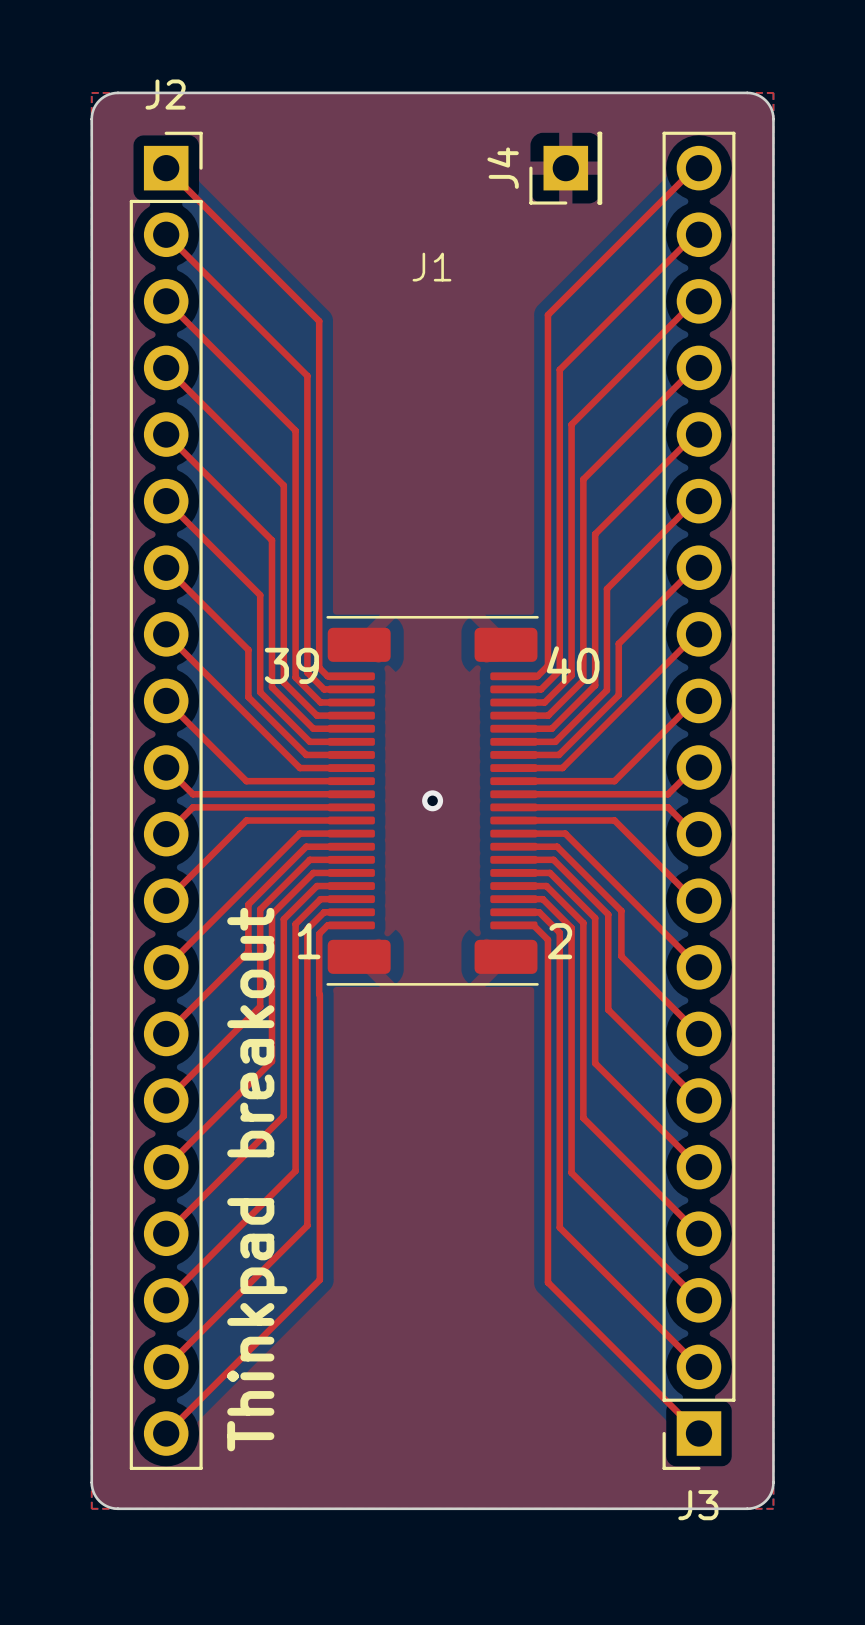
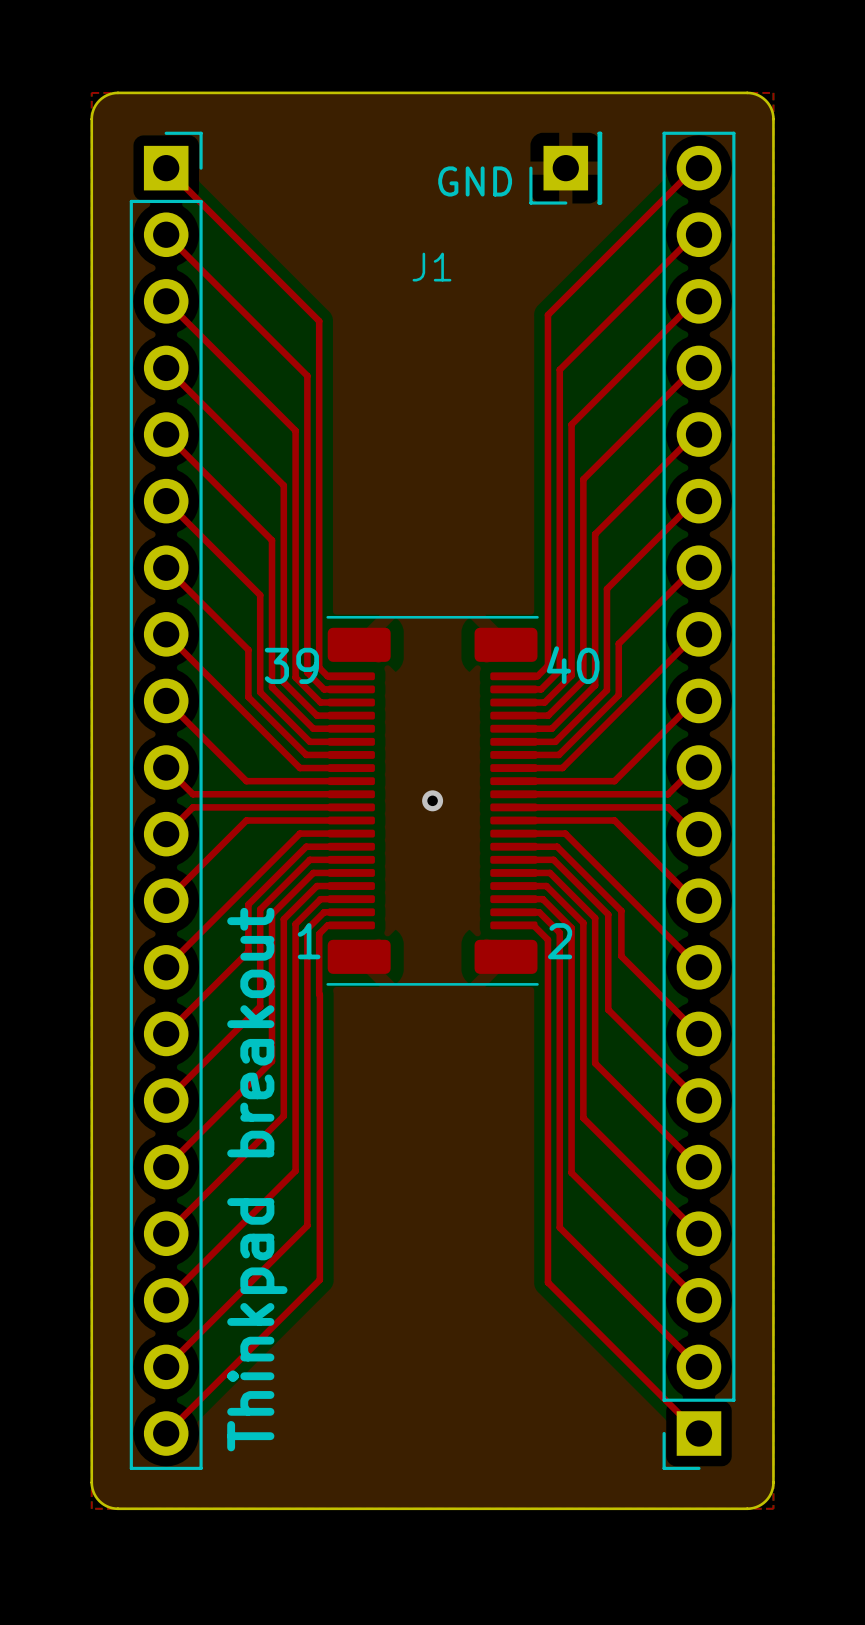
J2 name: J2 (165, 94) -> none
J4 name: J4 (503, 168) -> none
text: none -> GND (475, 181)
J3 name: J3 (698, 1505) -> none

